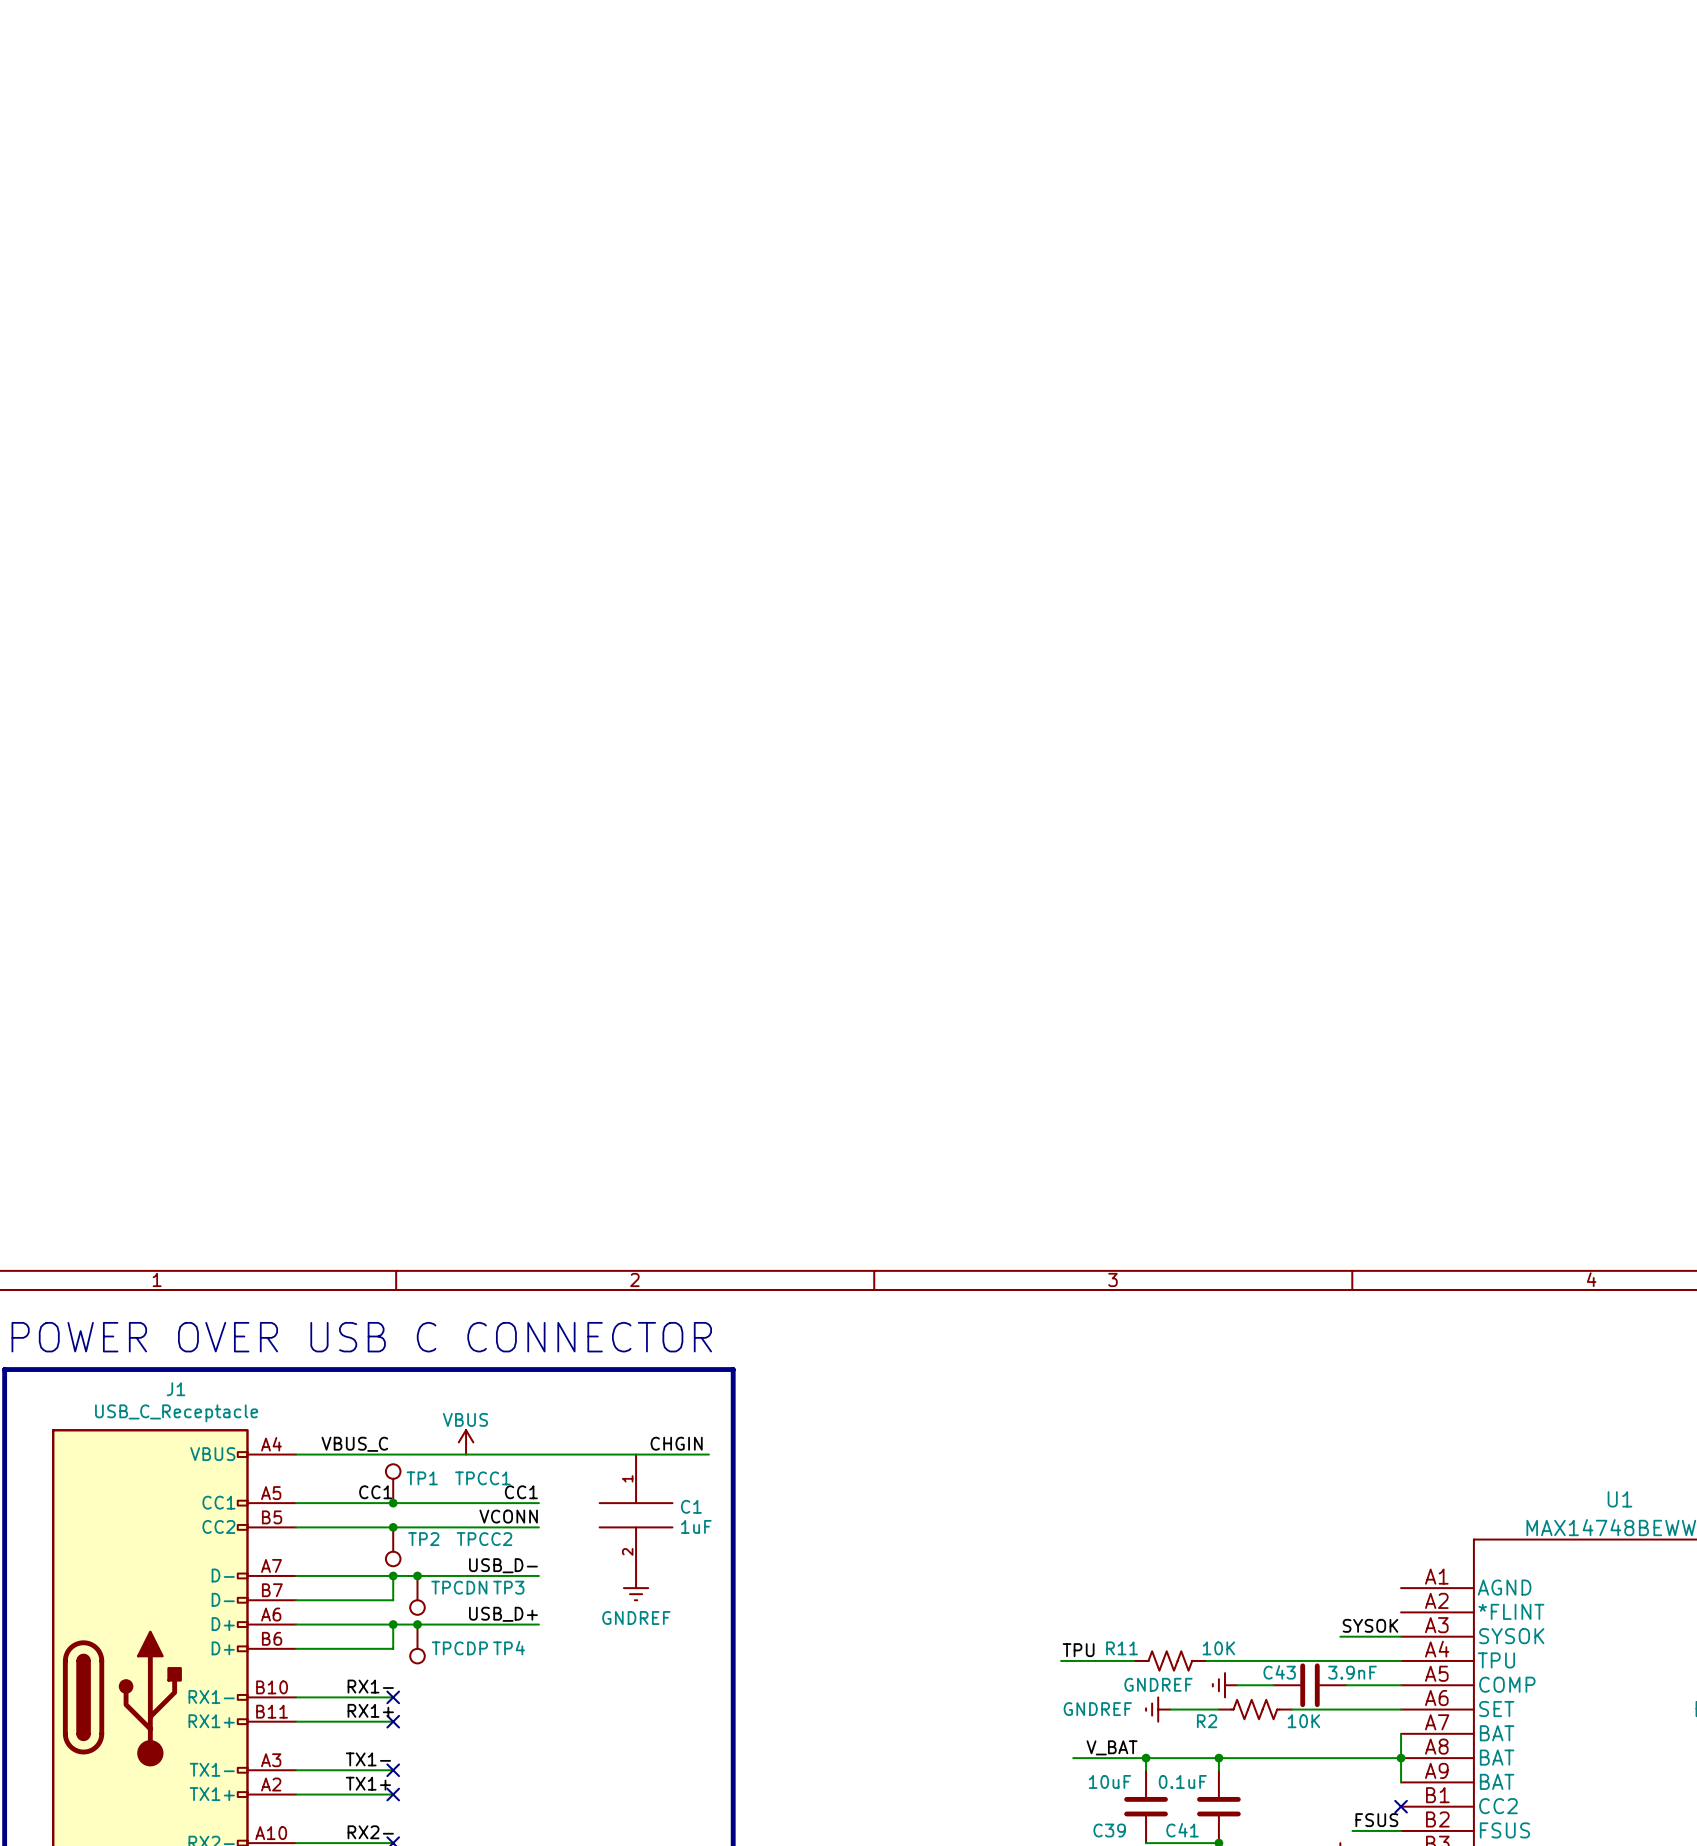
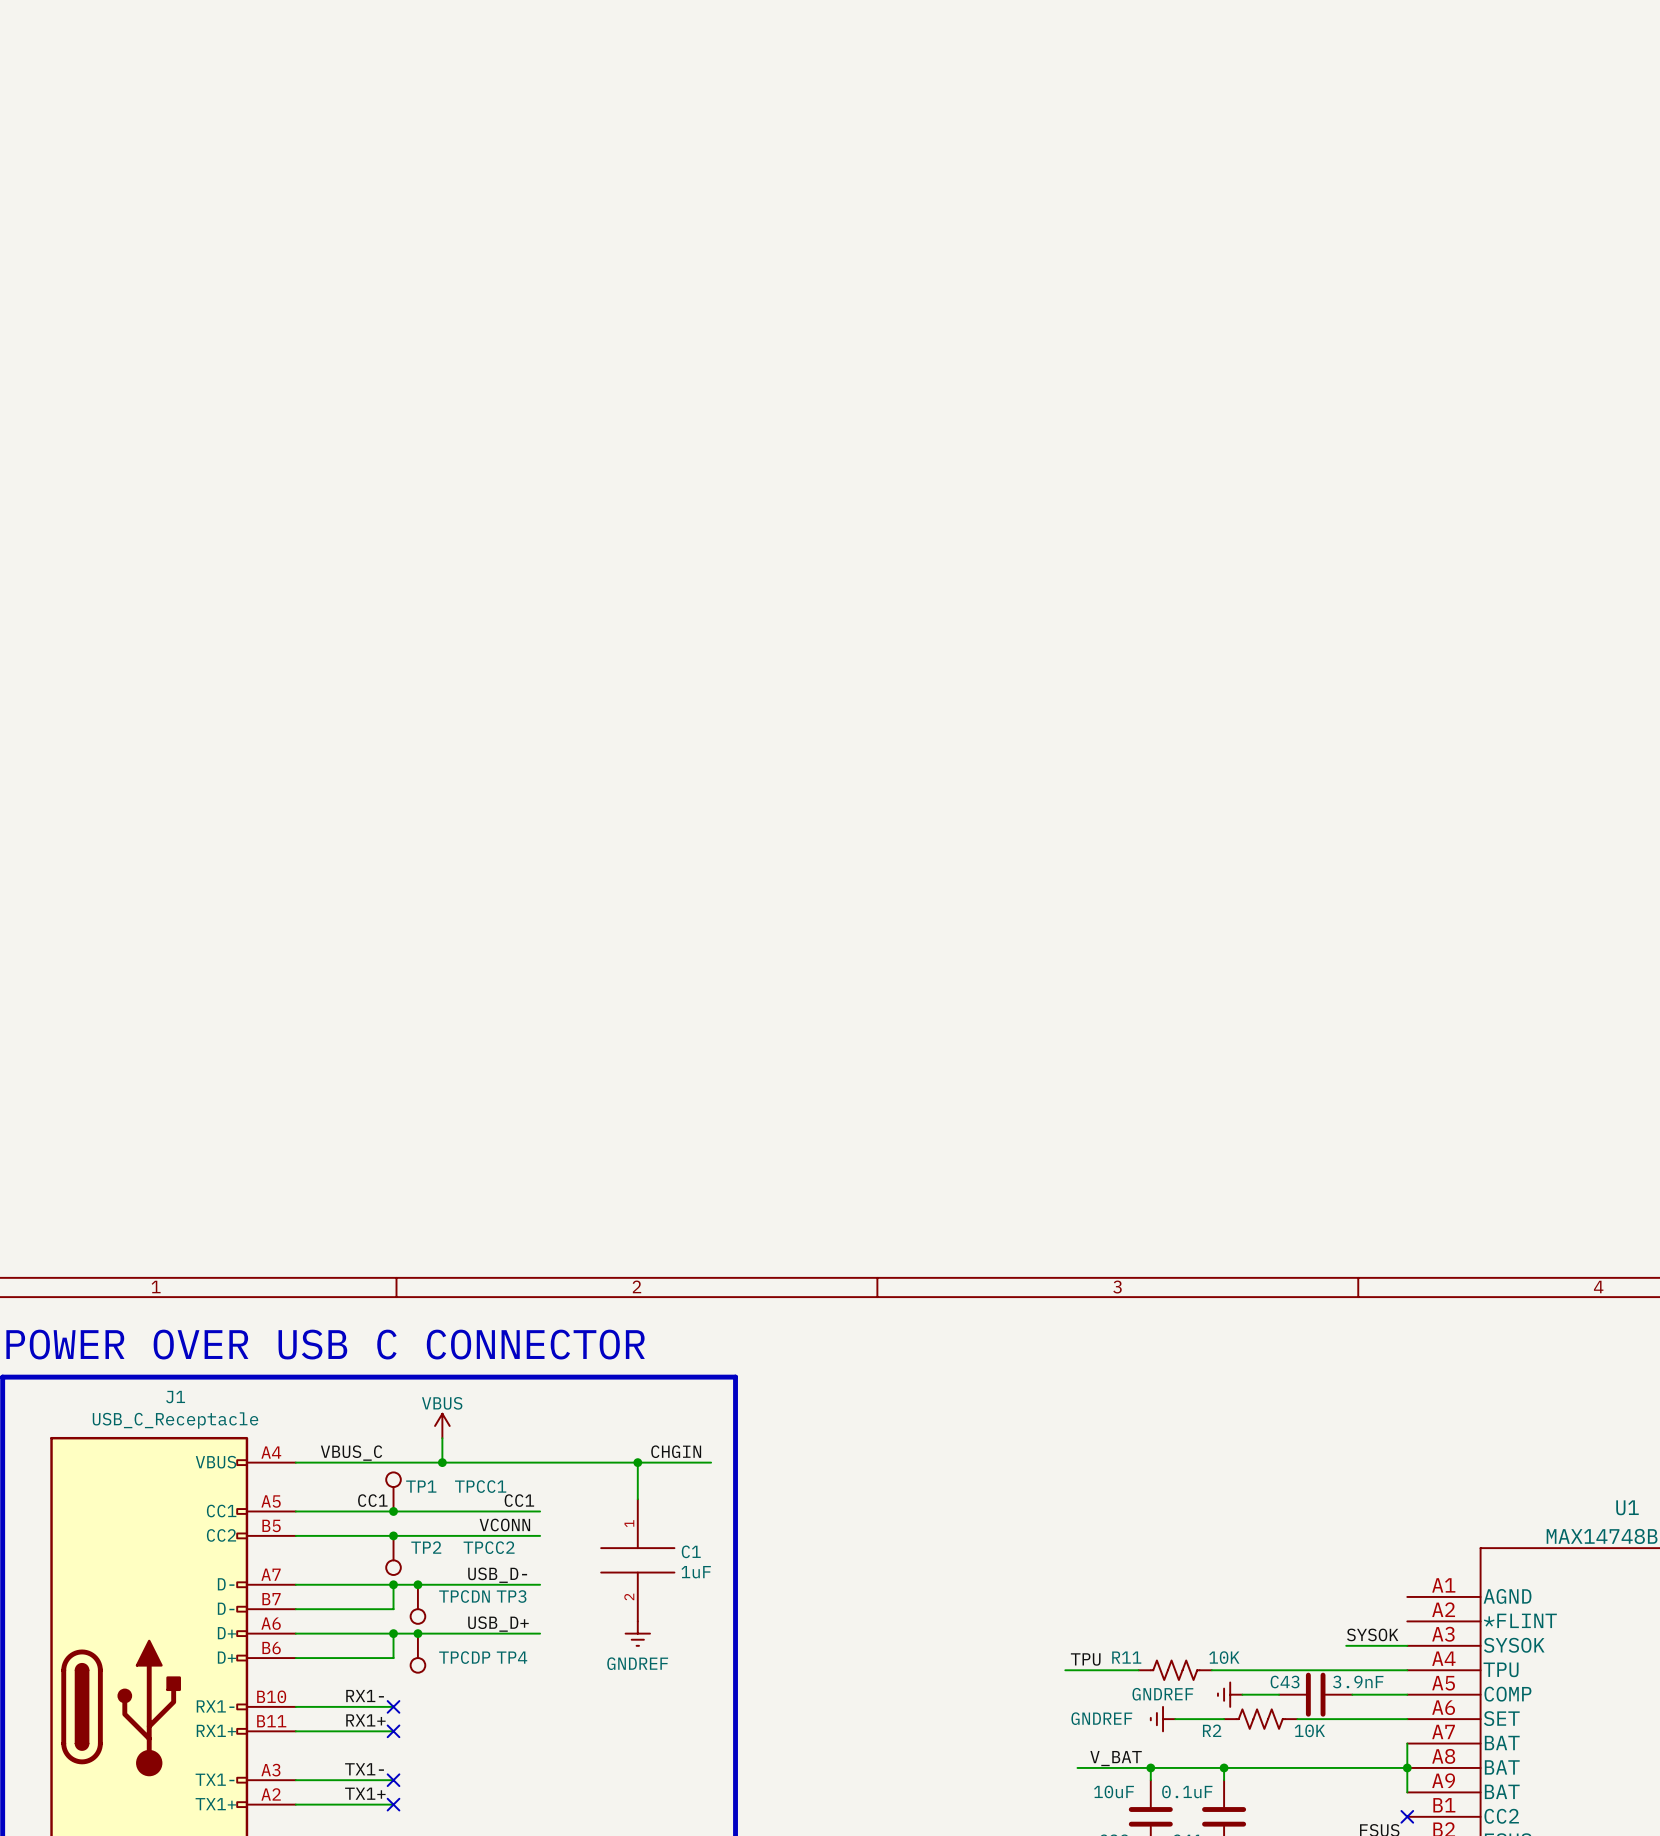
wire: none -> (442, 1438) (442, 1462)
power symbol position: VBUS (466, 1442) -> VBUS (442, 1425)
junction: none -> (442, 1462)
junction: none -> (637, 1462)
C1 position: (636, 1515) -> (637, 1560)
power symbol position: GNDREF (636, 1588) -> GNDREF (637, 1633)

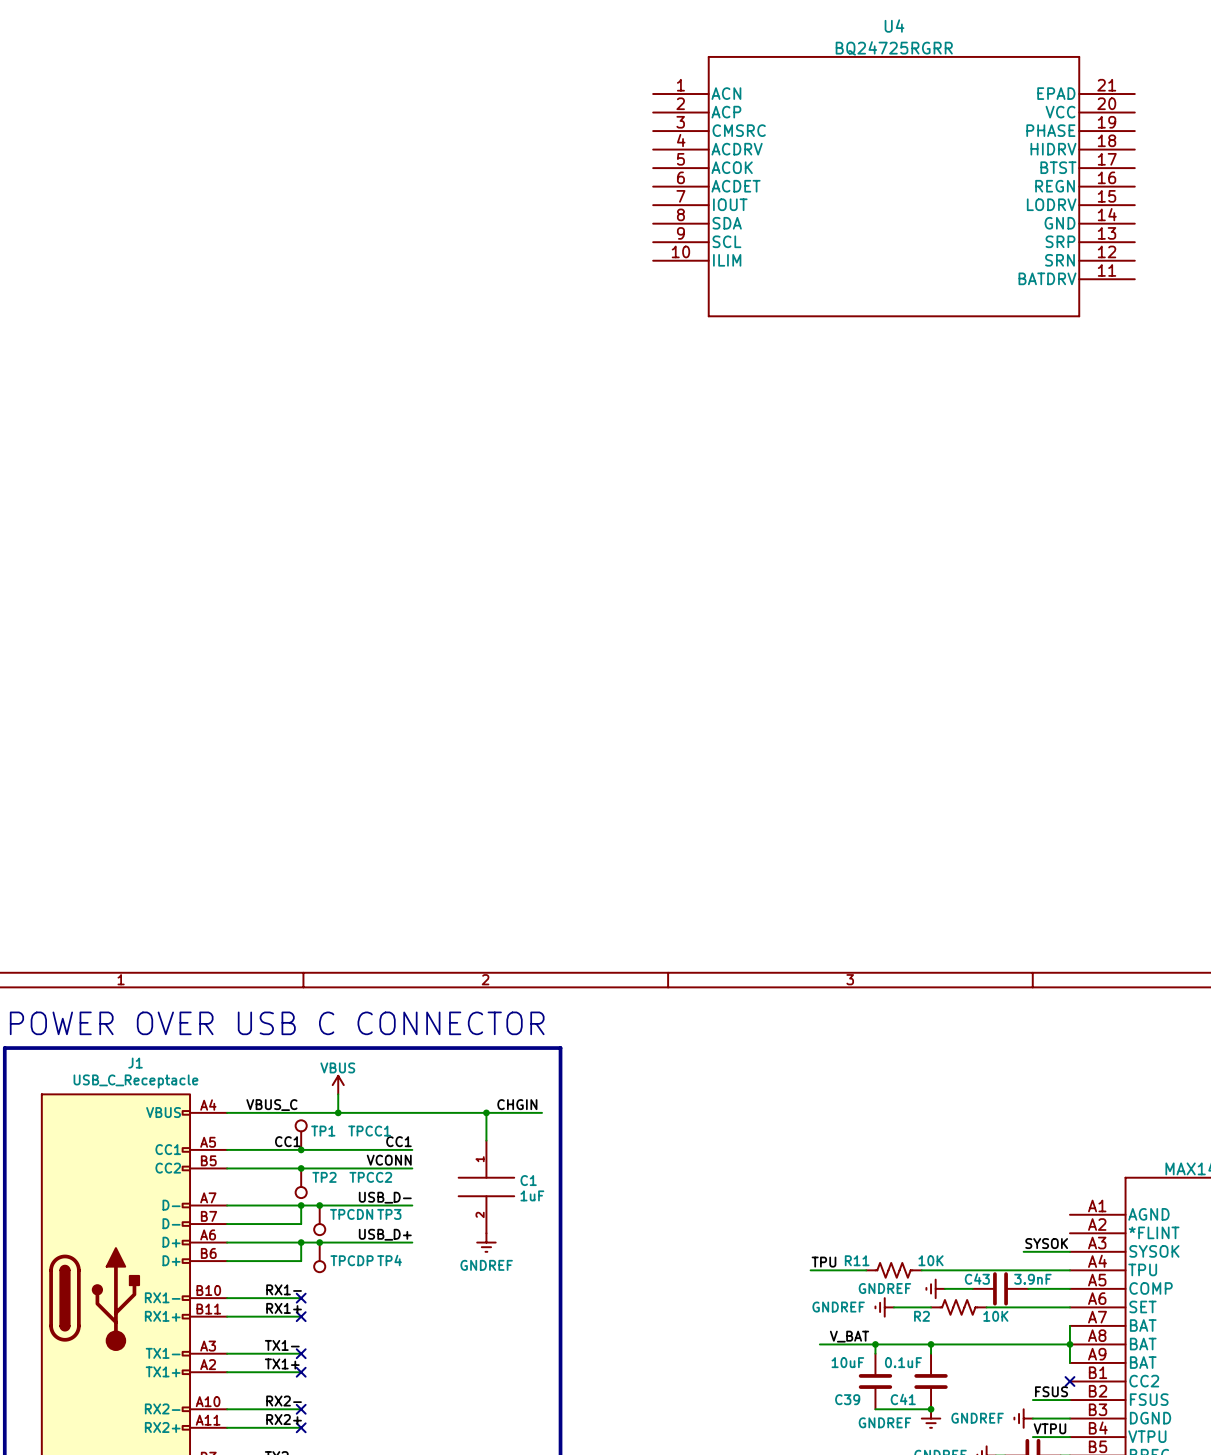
U4: none -> BQ24725RGRR (893, 186)

